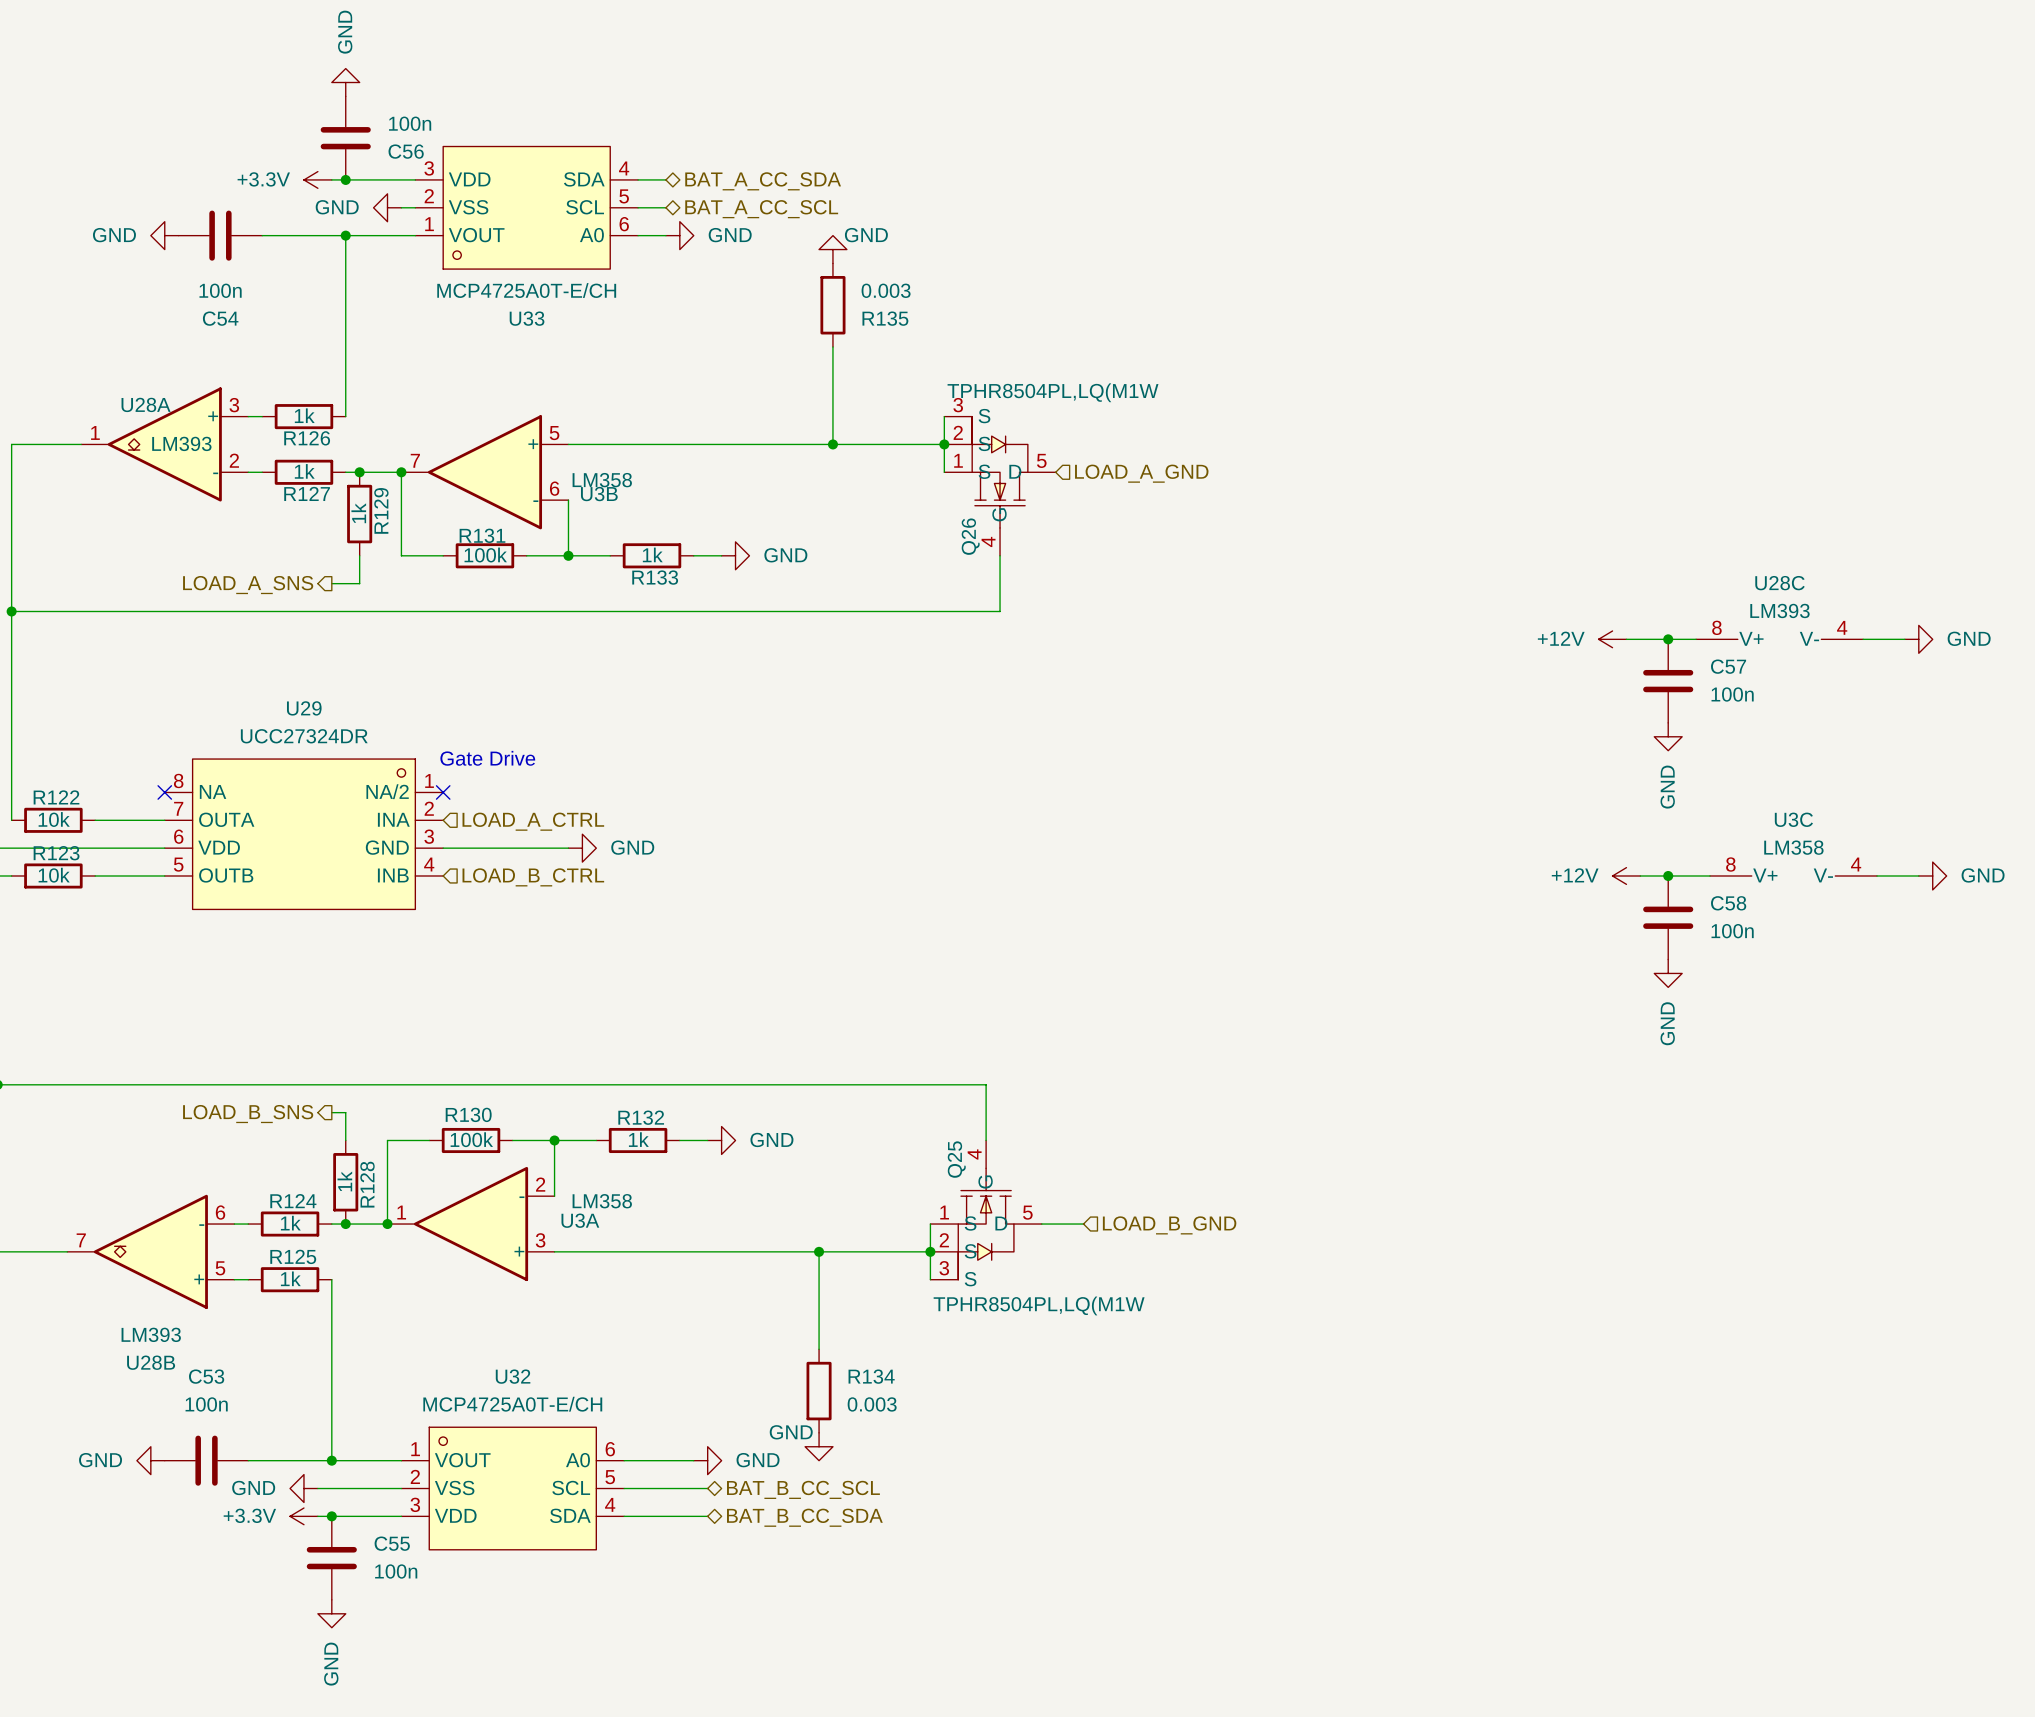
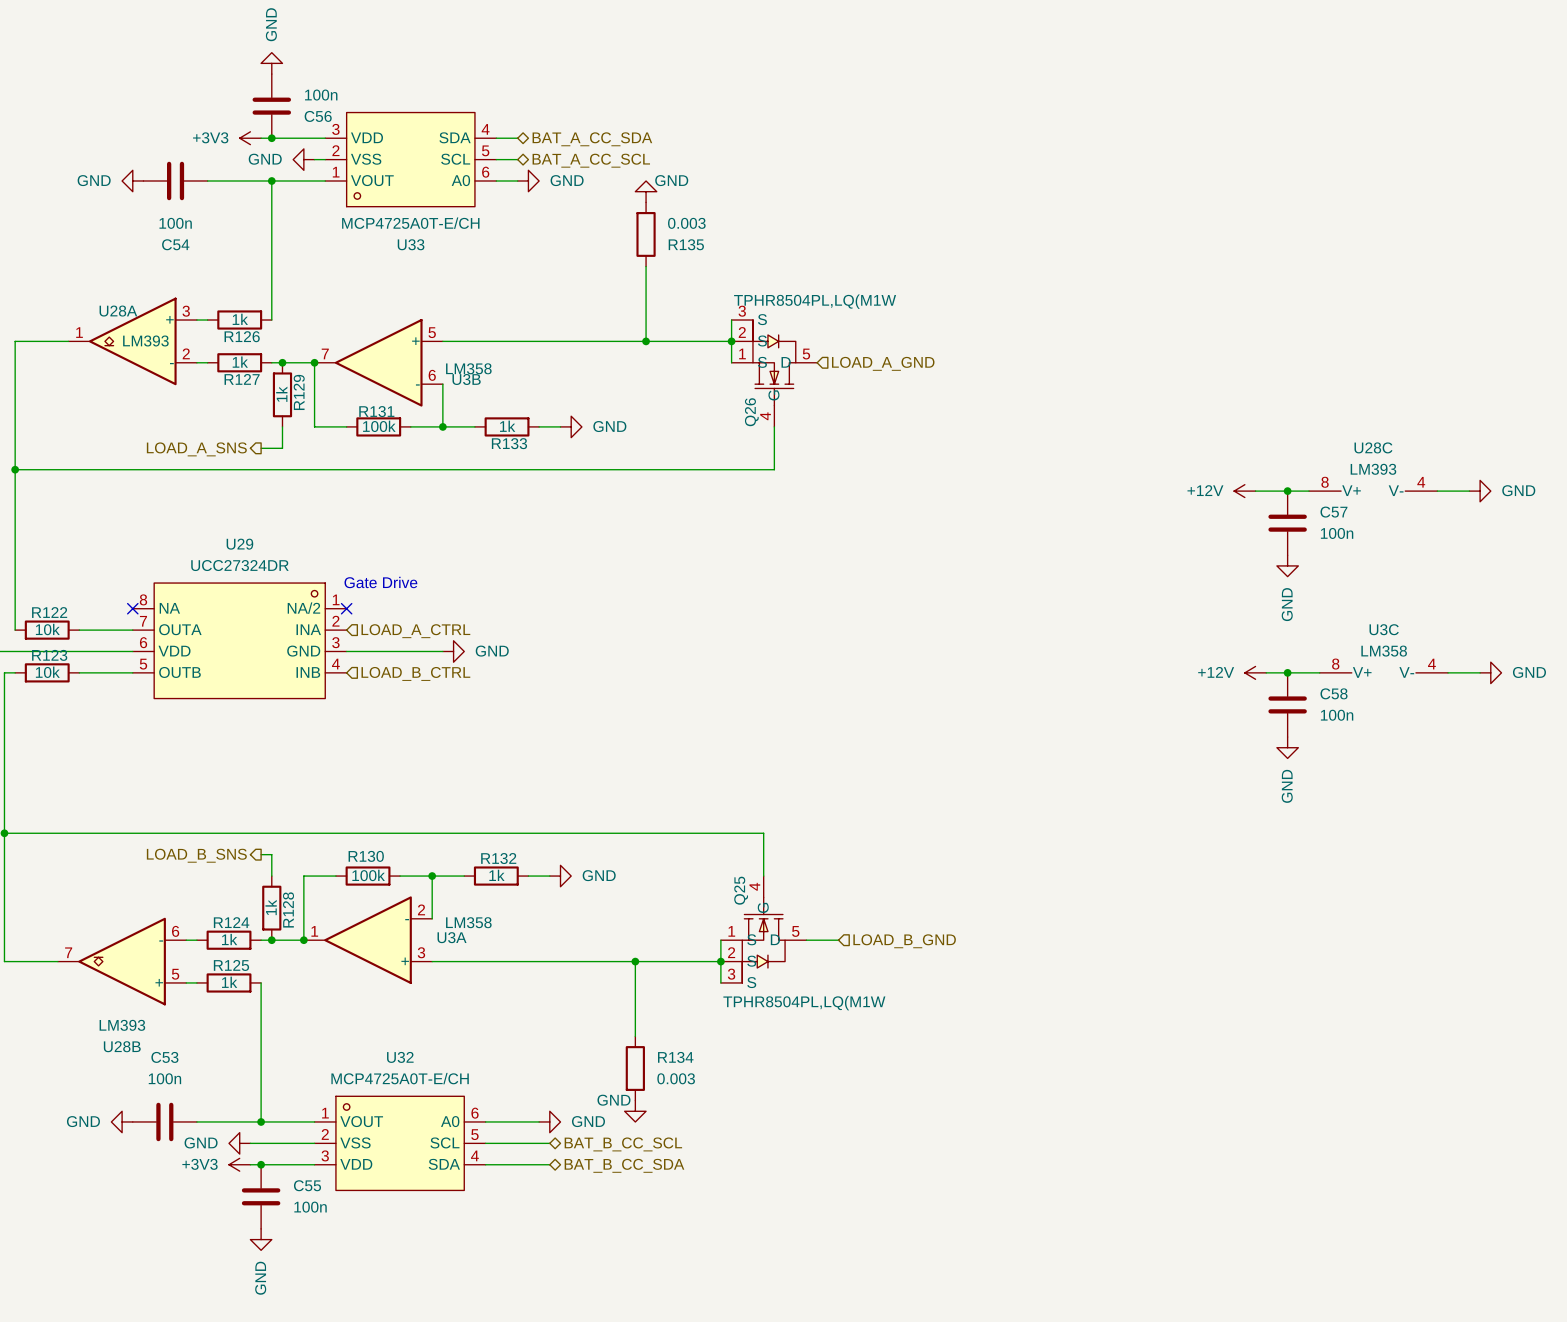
power symbol: +3.3V (317, 179) -> +3V3 (250, 138)
power symbol: +3.3V (303, 1516) -> +3V3 (239, 1164)

